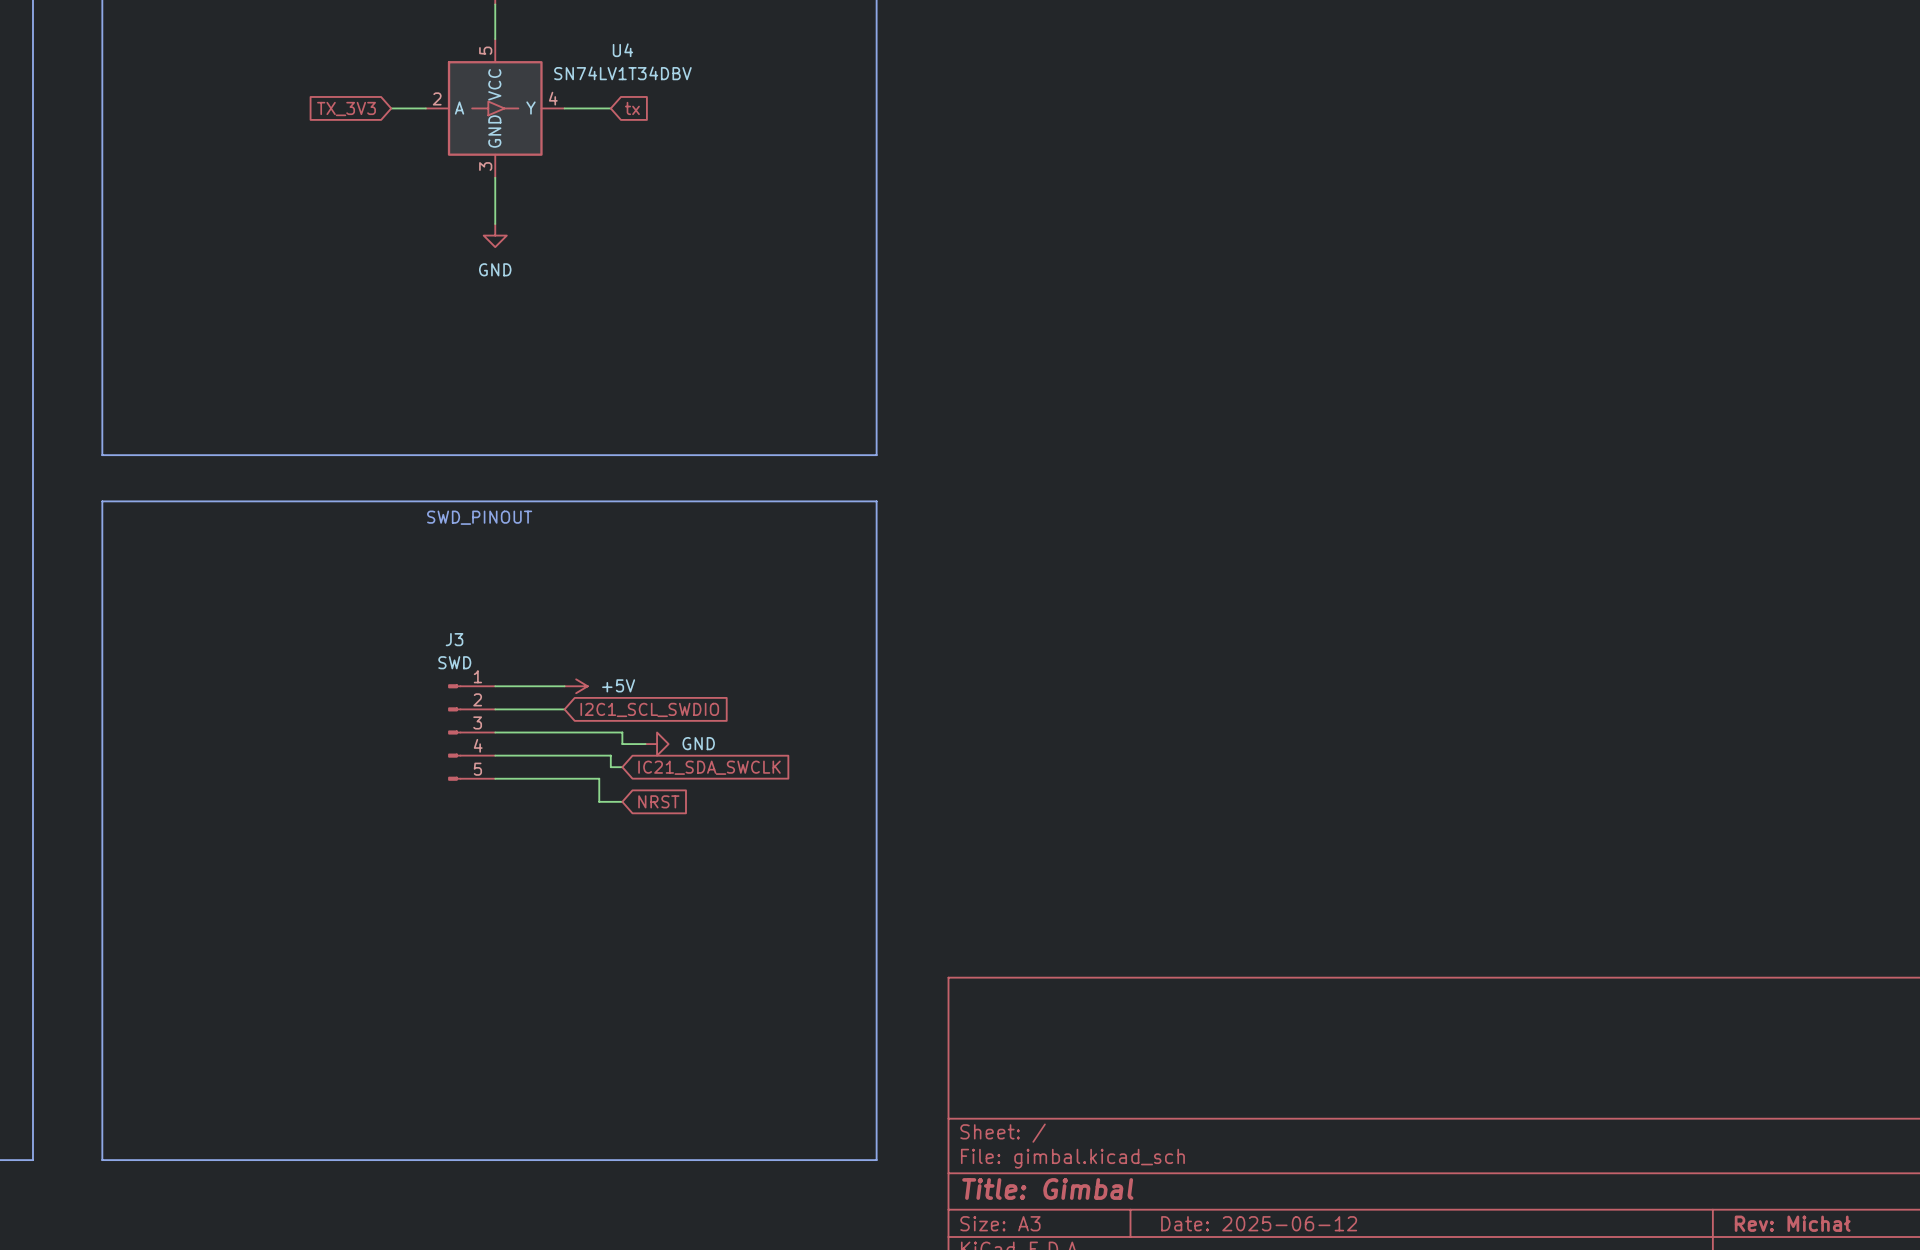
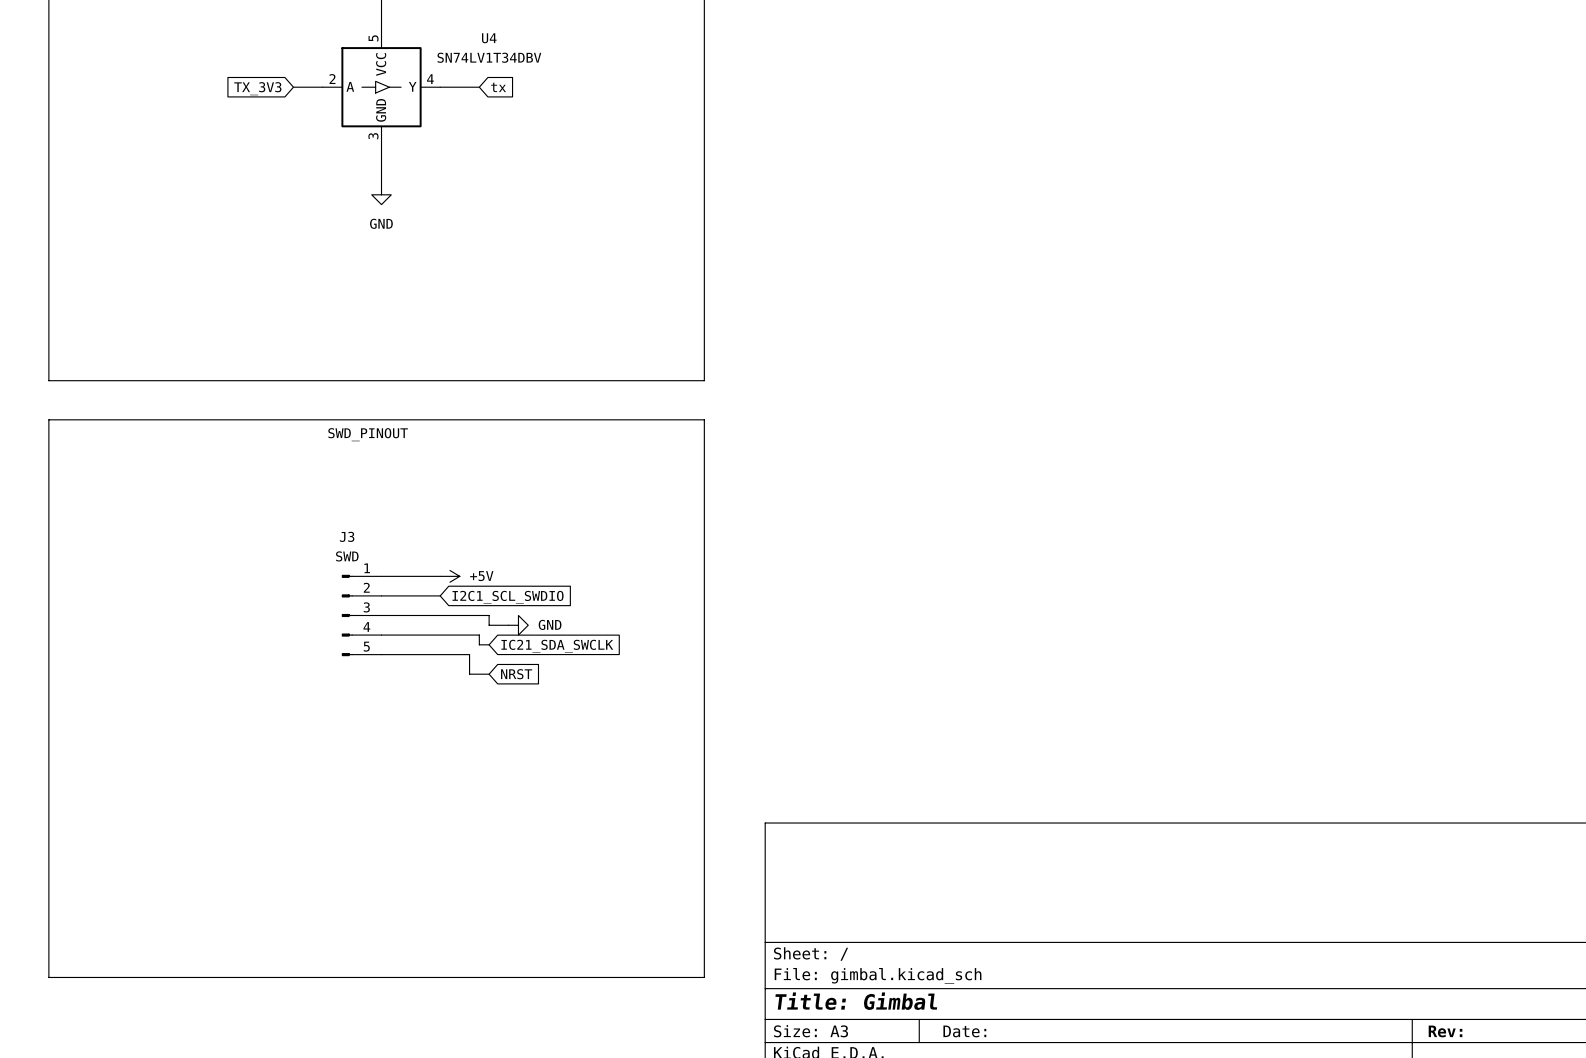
title block: Date: 2025-06-12 (1259, 1223) -> Date: (964, 1031)
title block: Rev: Michał (1792, 1223) -> Rev: (1445, 1031)

